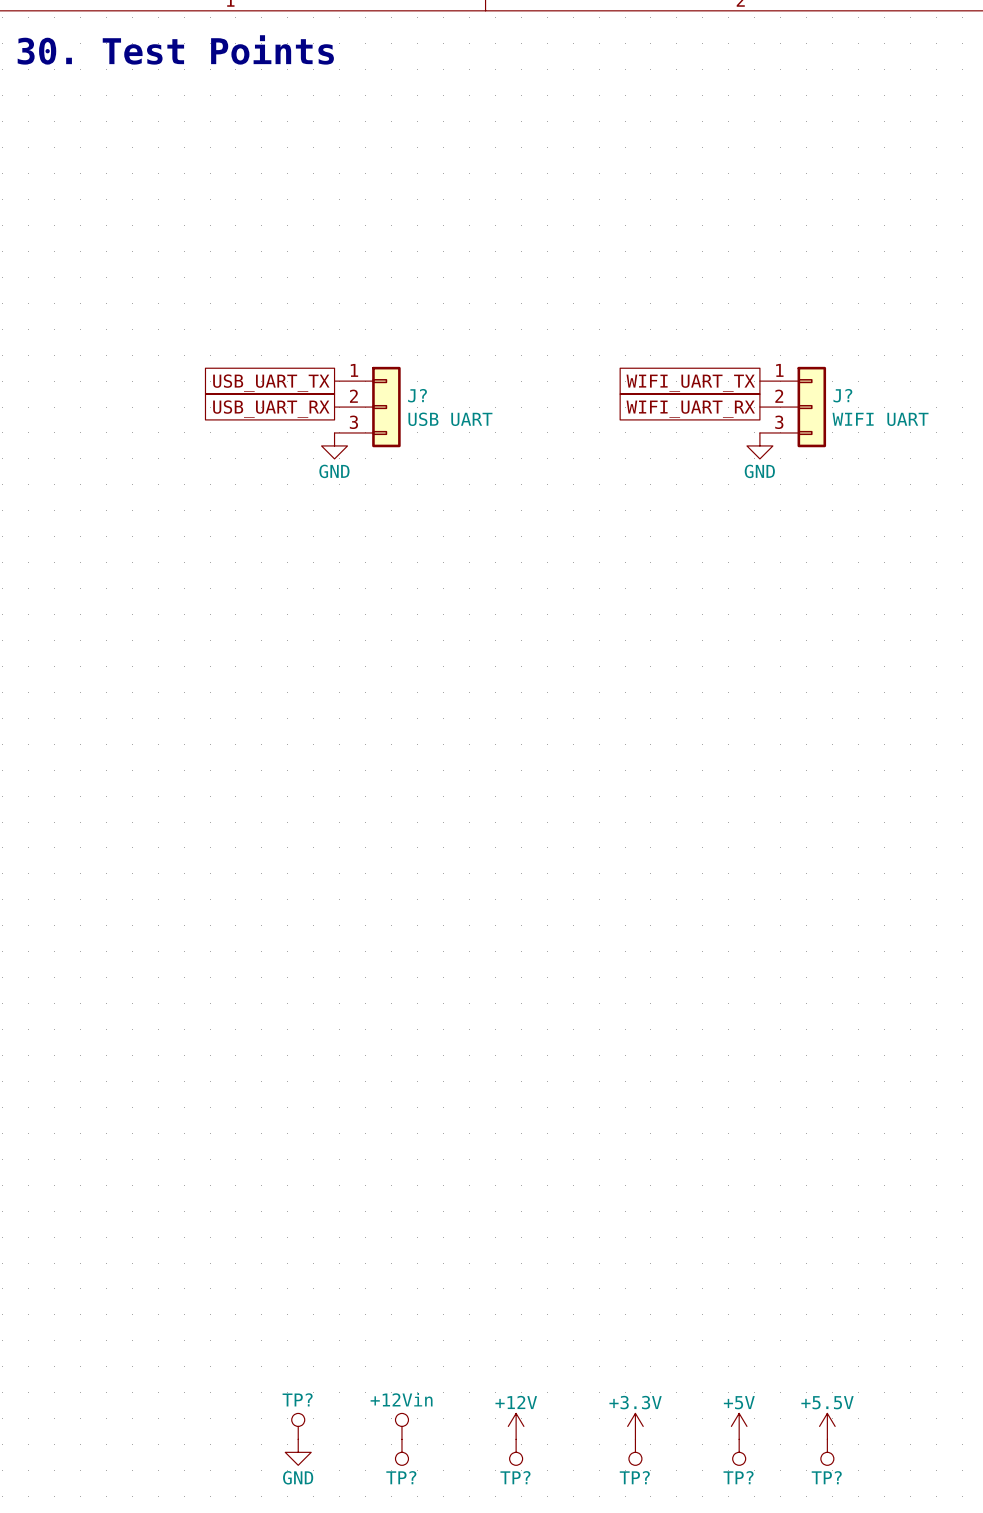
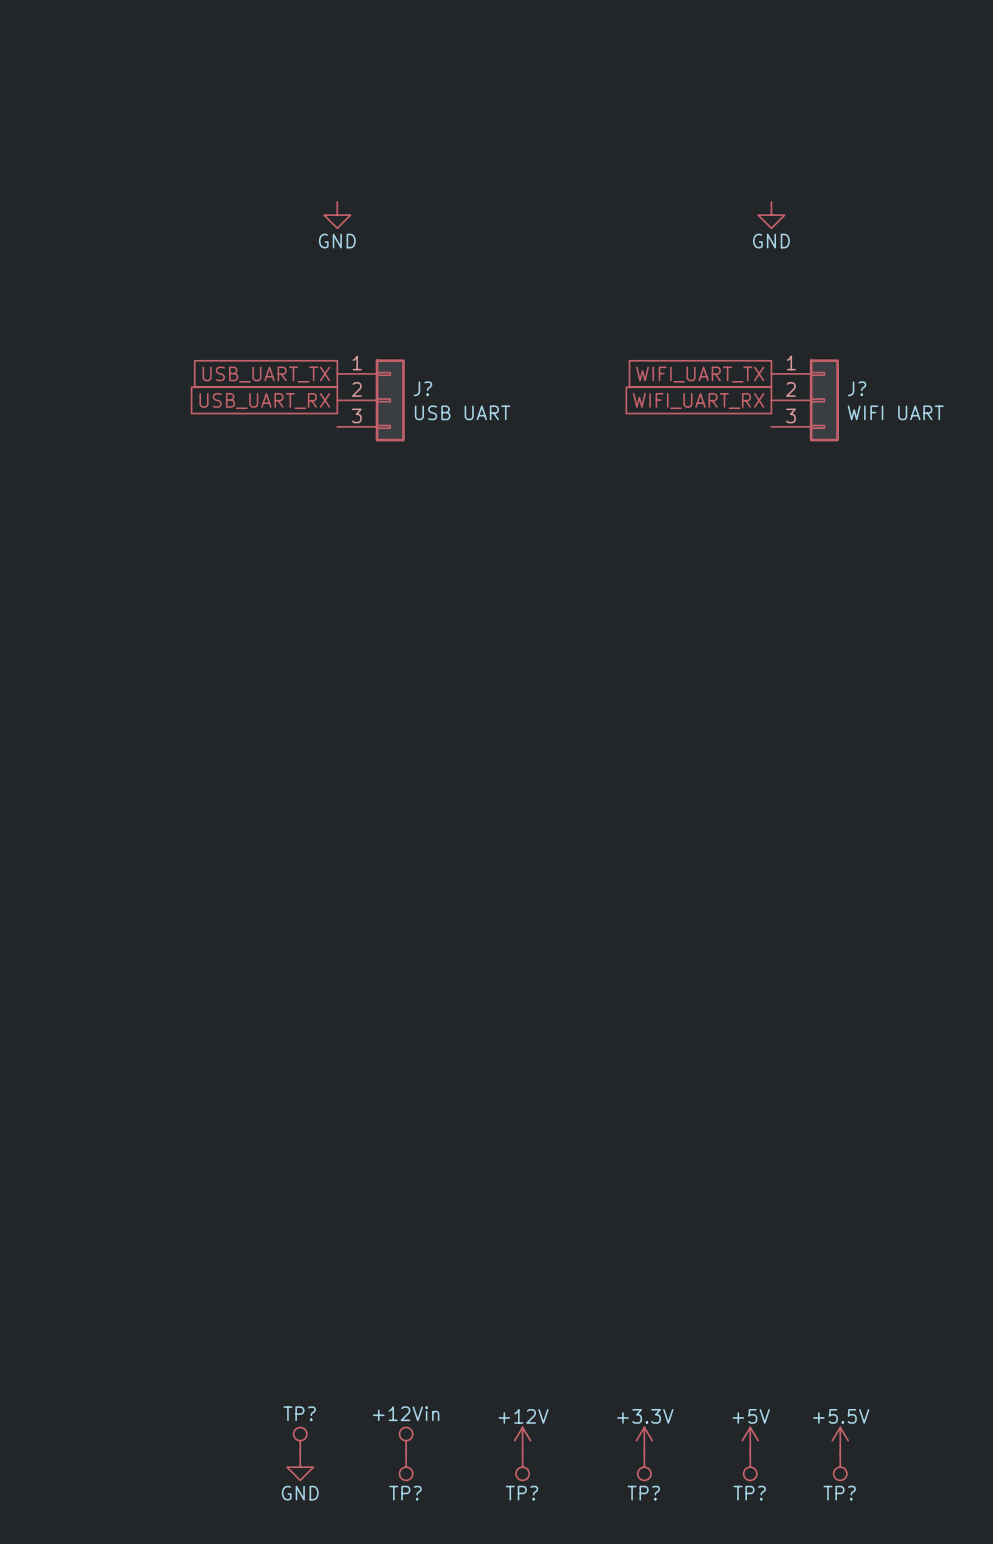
text: 30. Test Points (175, 49) -> none
power symbol position: GND (334, 445) -> GND (337, 215)
power symbol position: GND (759, 445) -> GND (771, 215)

